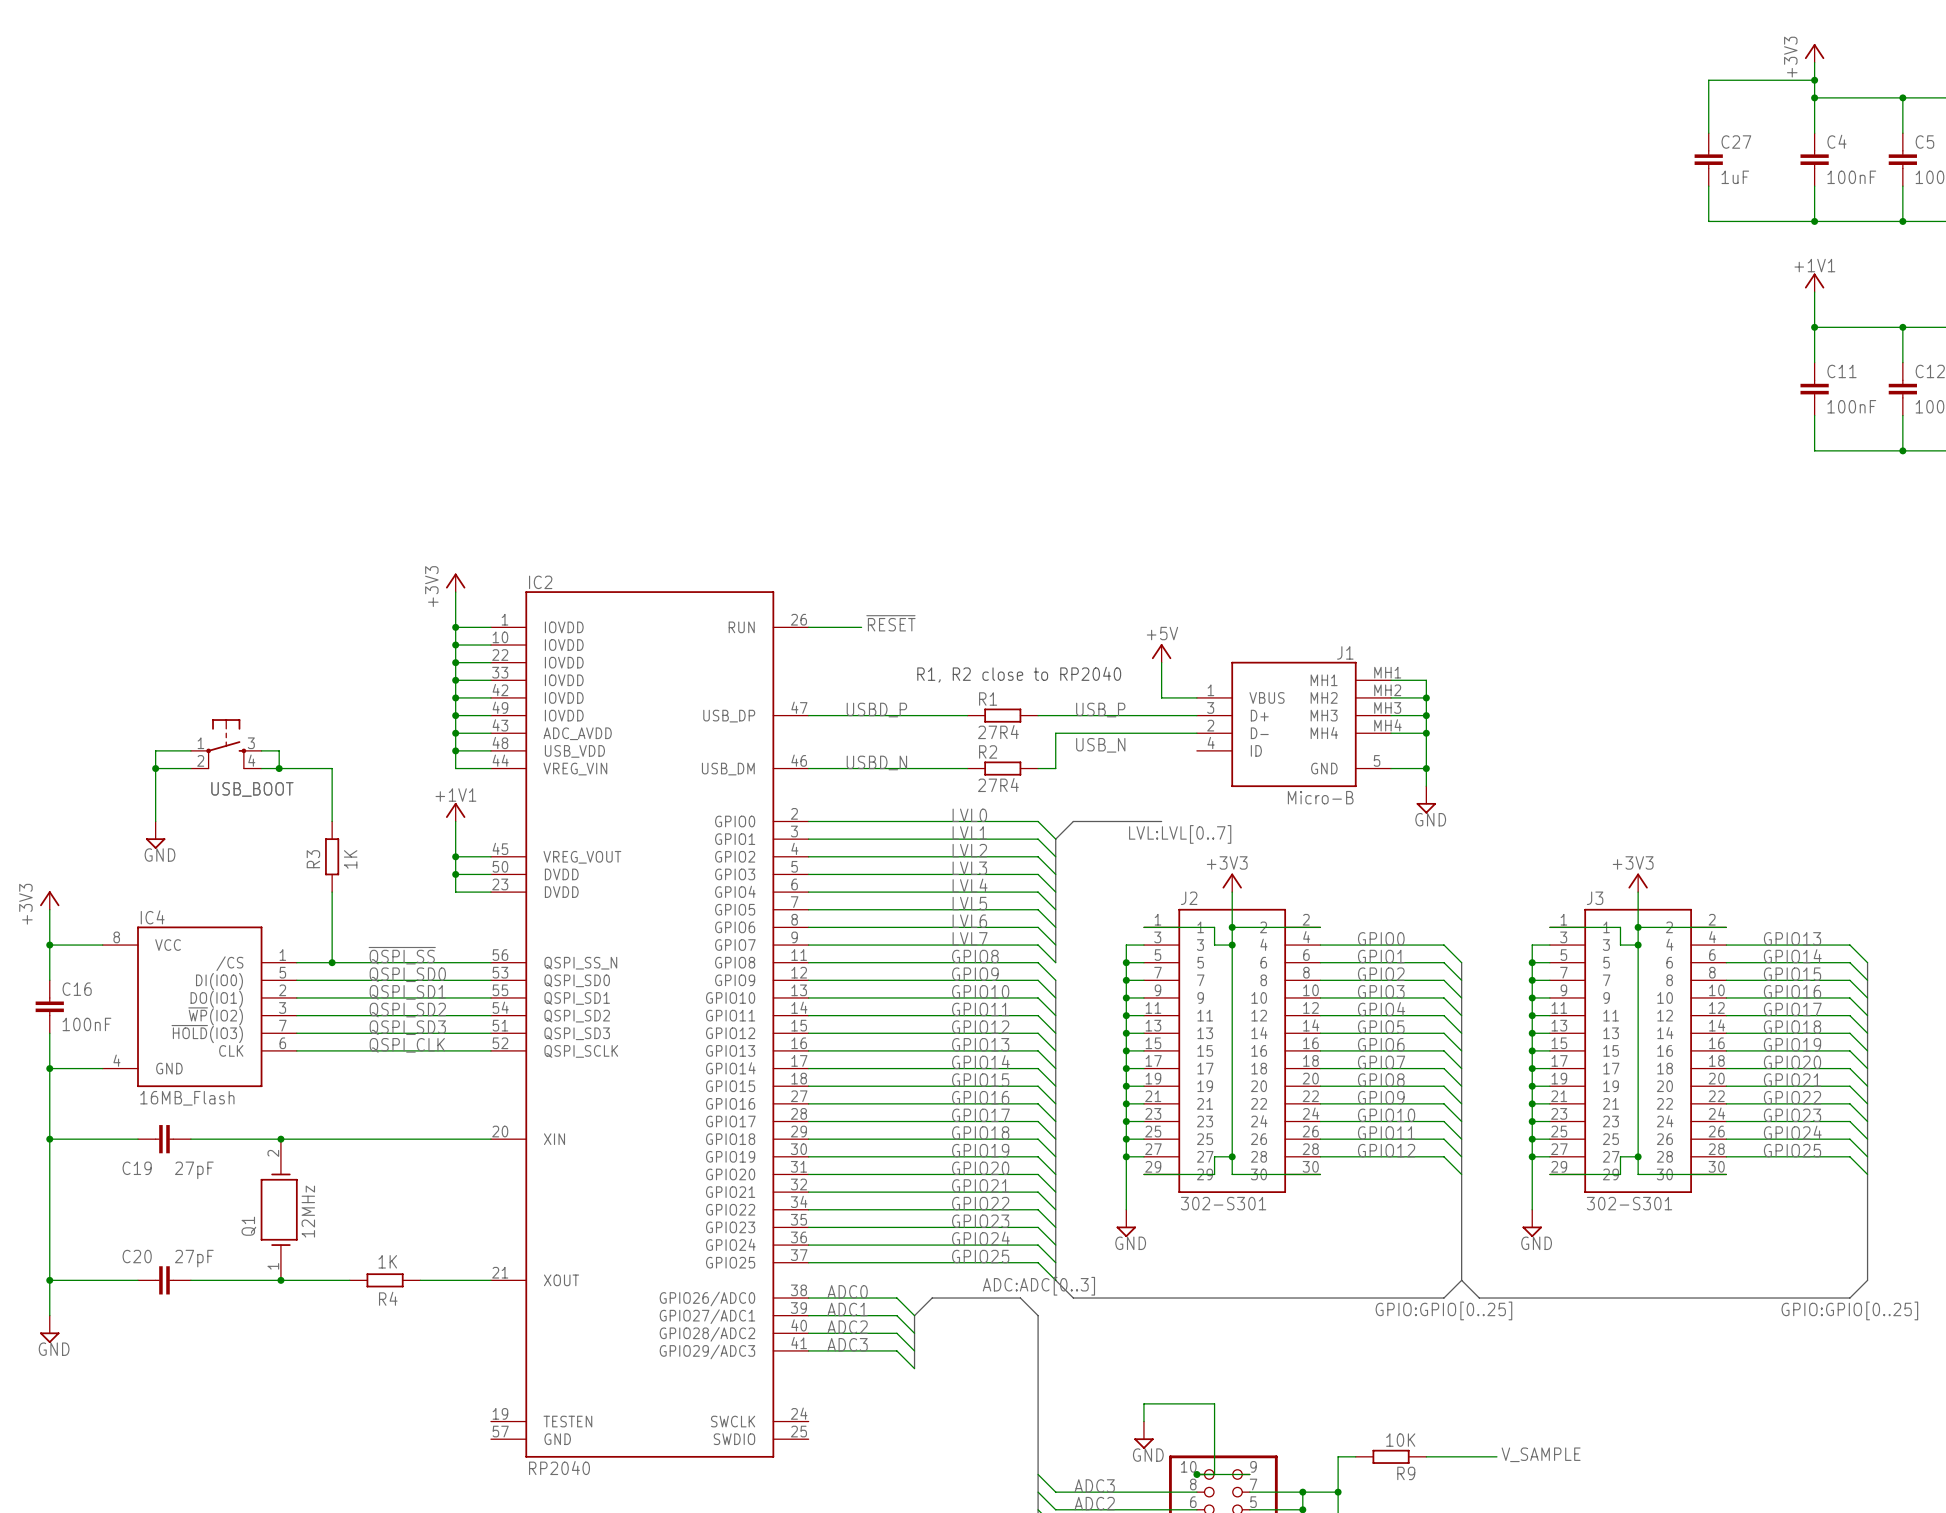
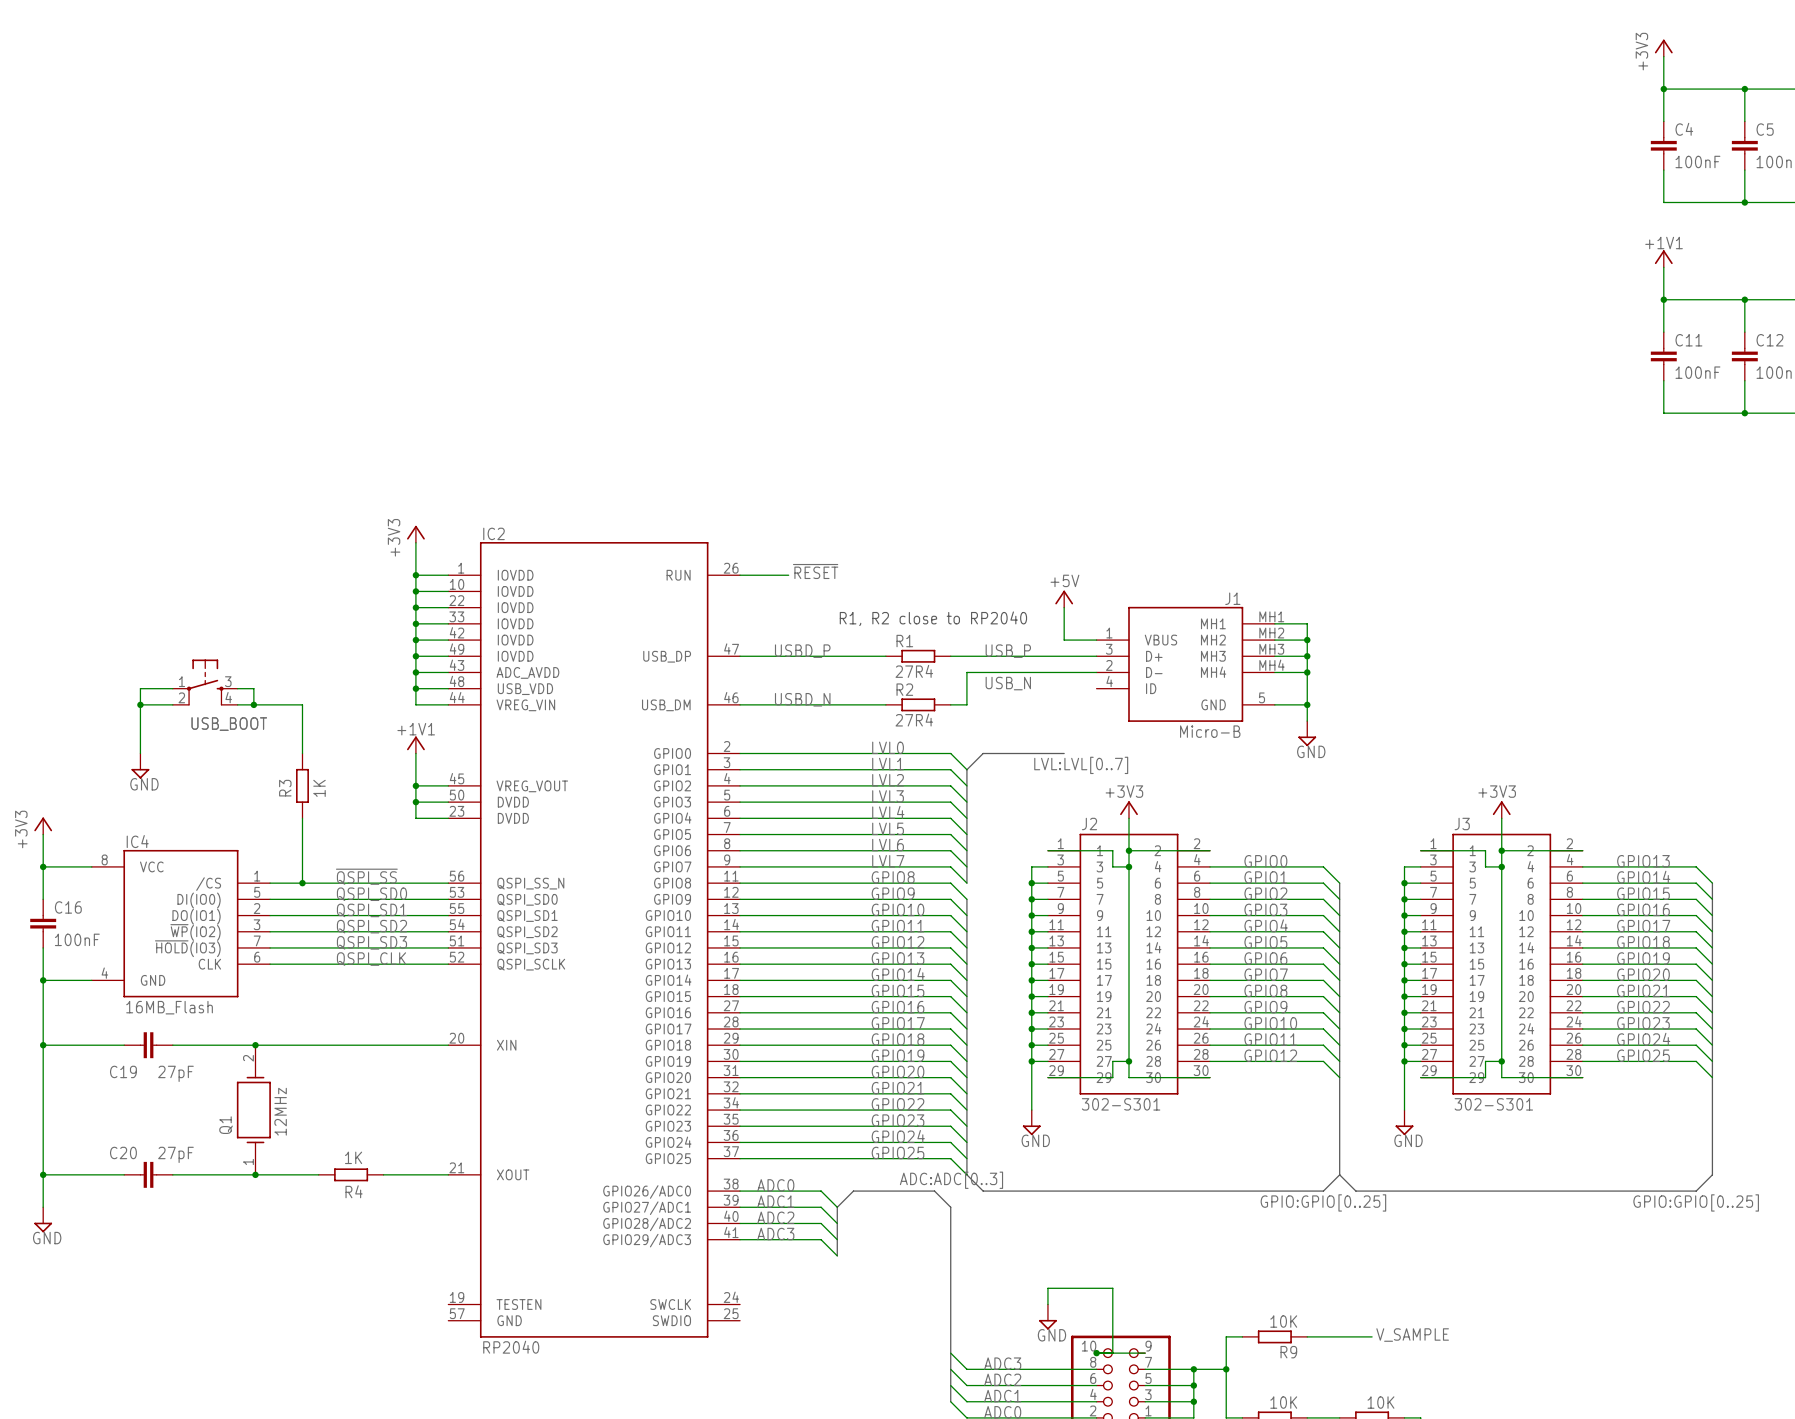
wire: (1814, 80) (1708, 80) (1708, 133) -> none
junction: (1814, 80) -> none
C27: 1uF (1708, 159) -> none
wire: (1708, 186) (1708, 221) (1814, 221) -> none
junction: (1814, 221) -> none

